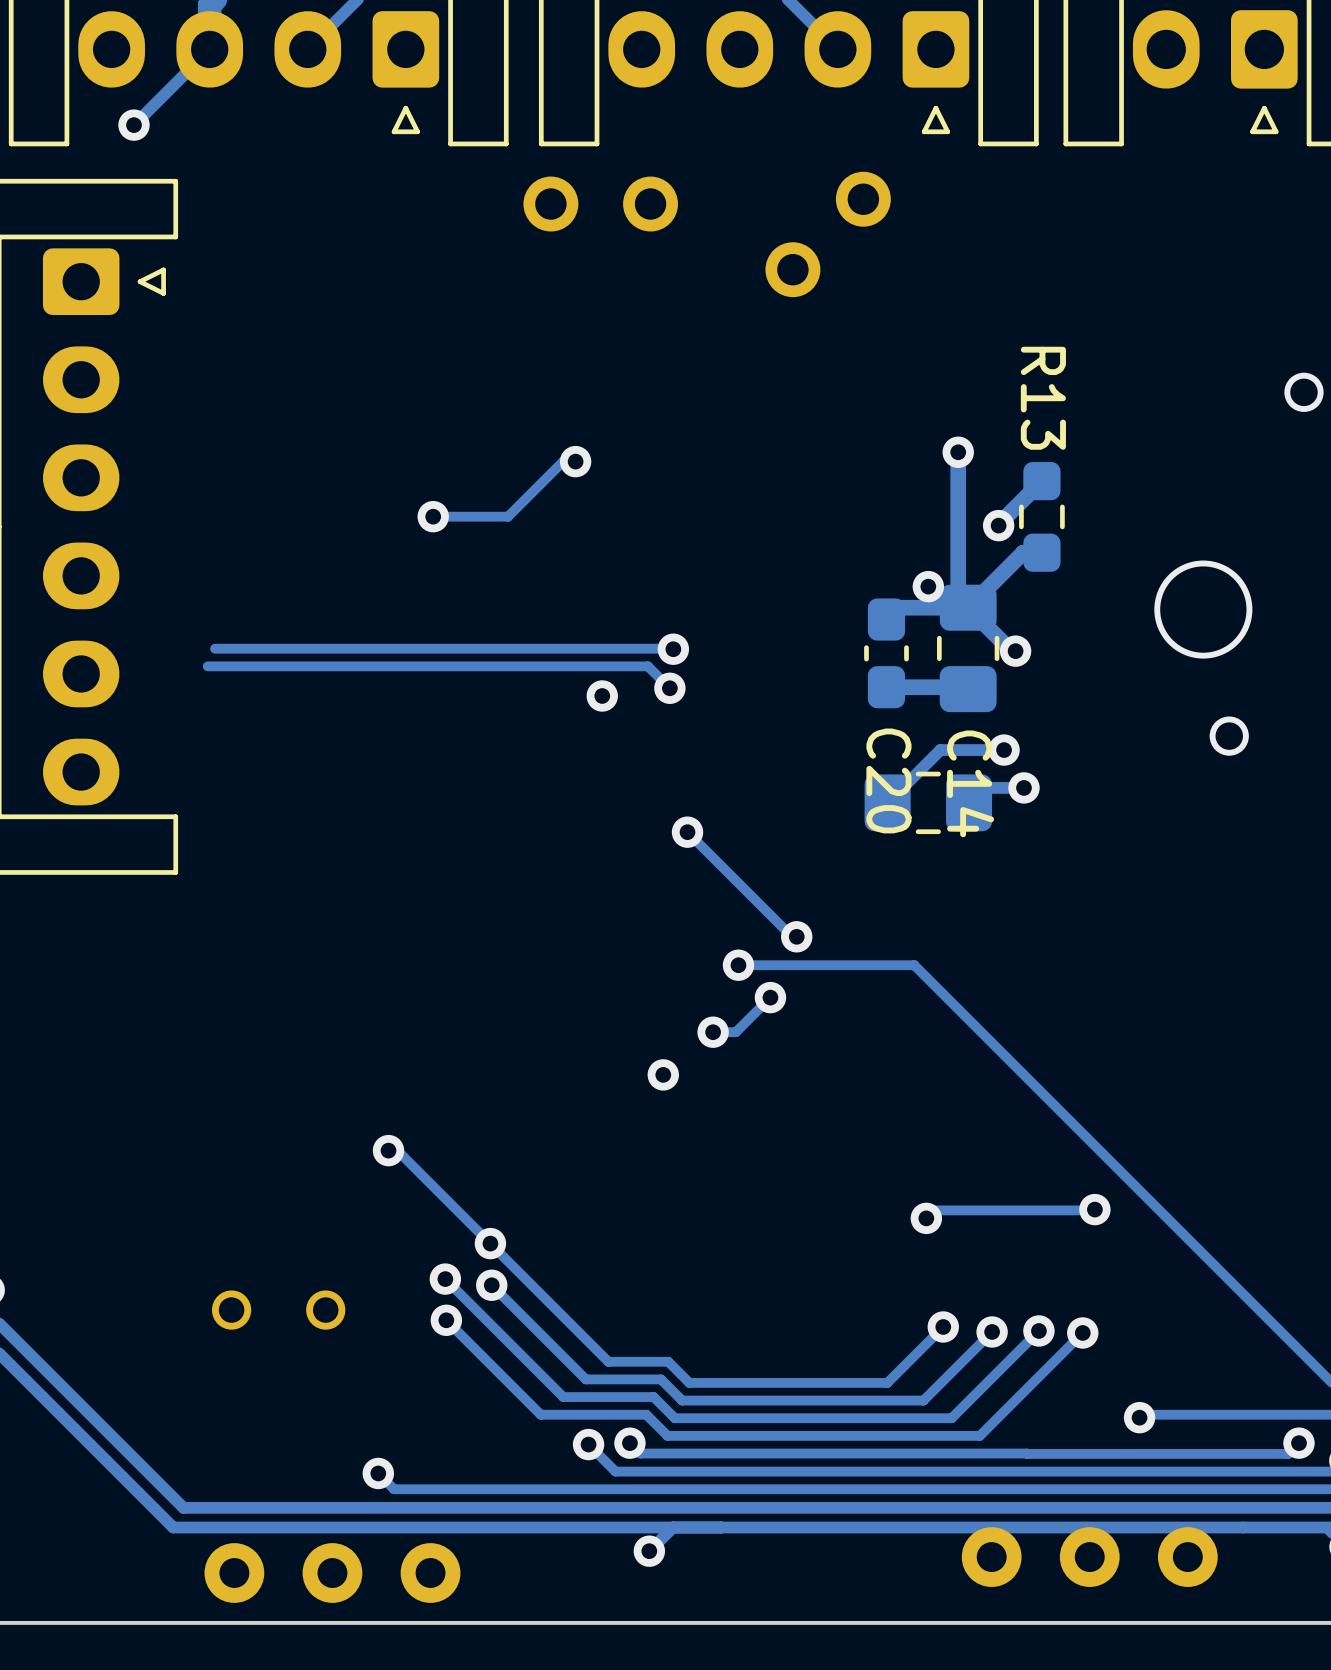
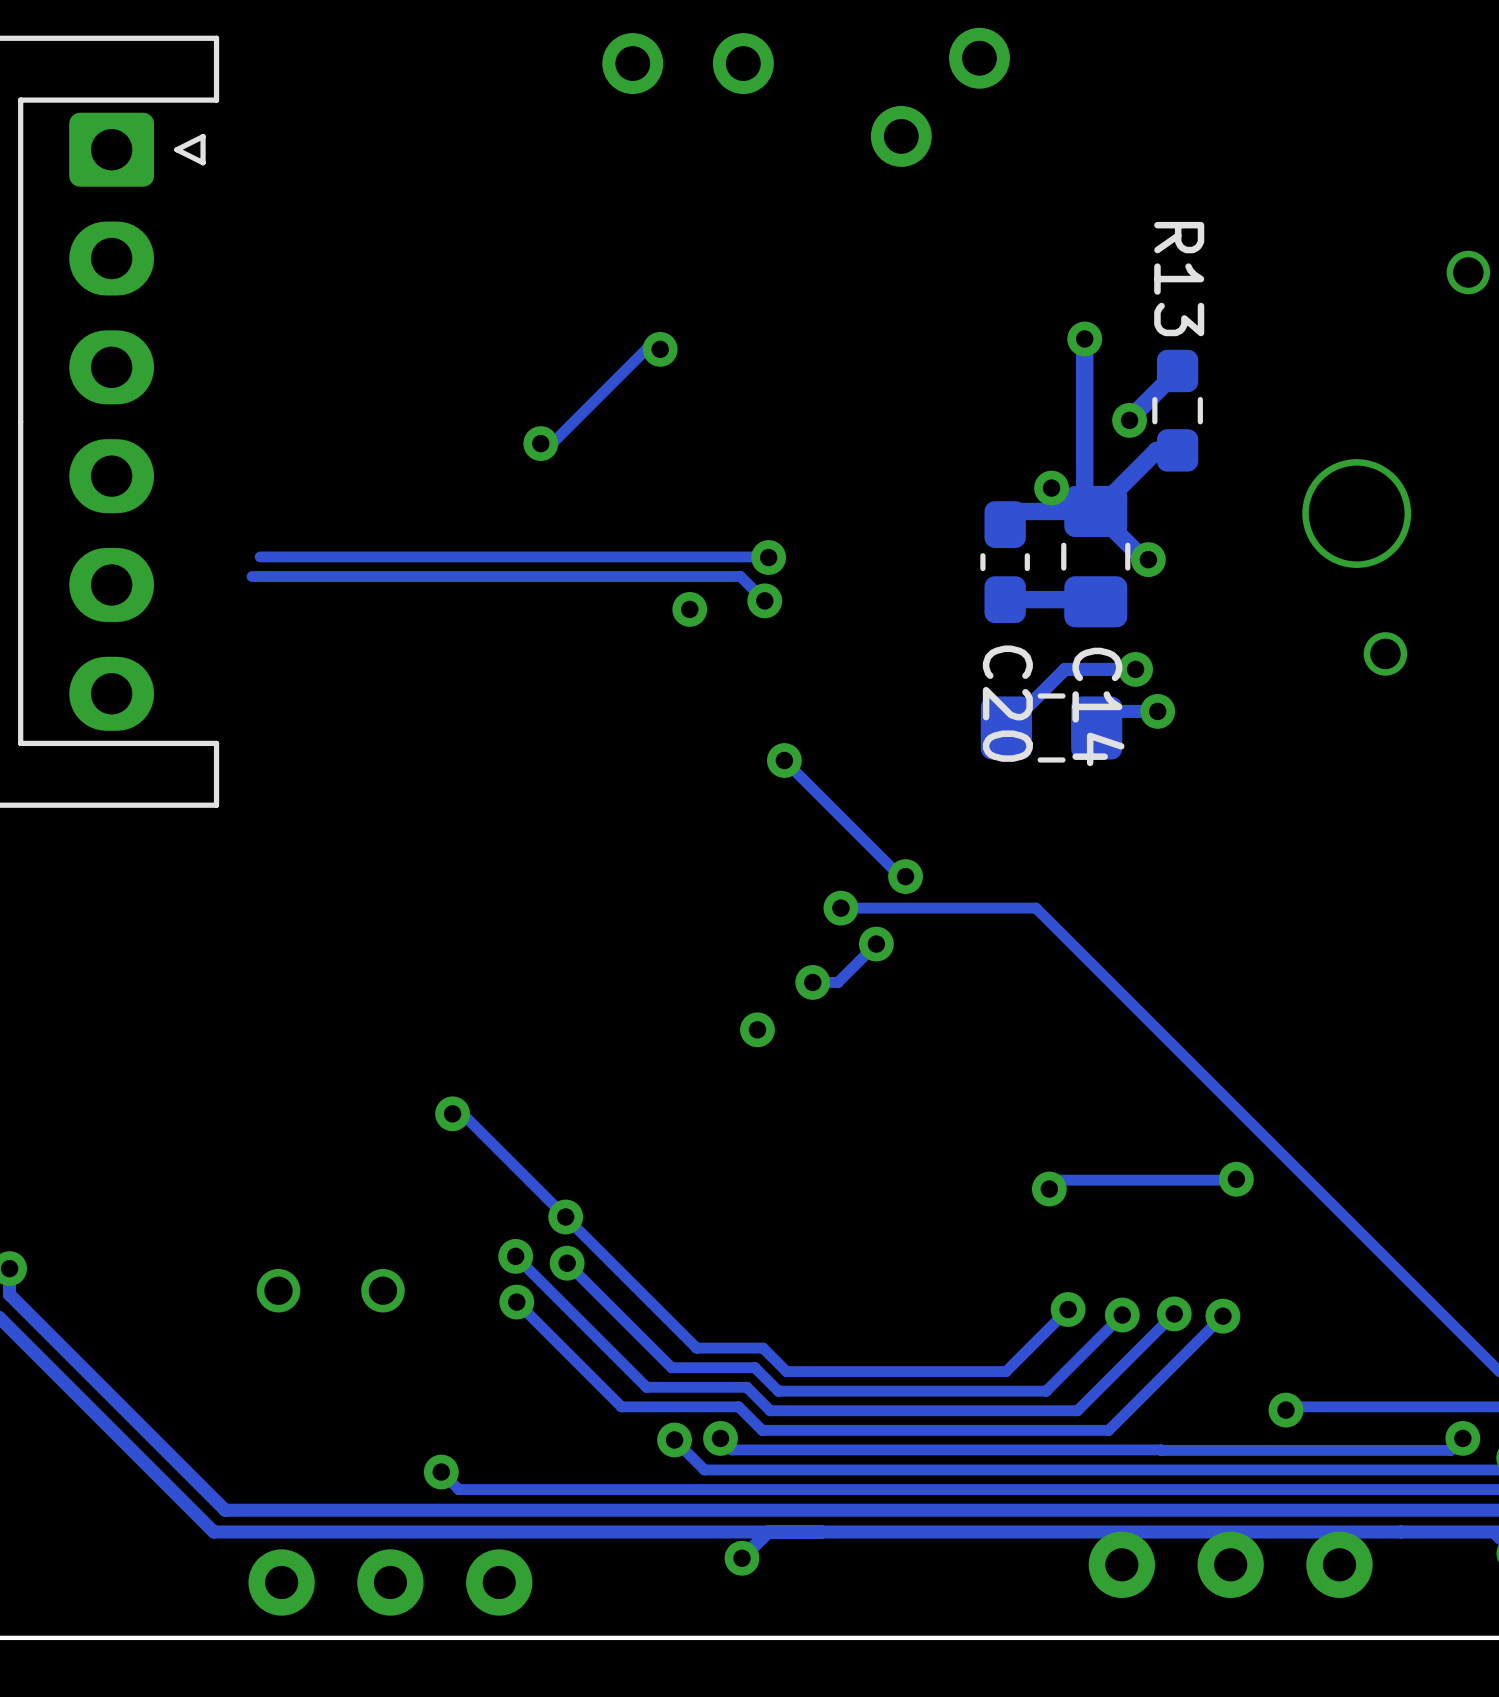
via position: (433, 516) -> (540, 443)
track: (508, 516) (433, 516) -> (585, 410) (552, 443) (540, 443)

